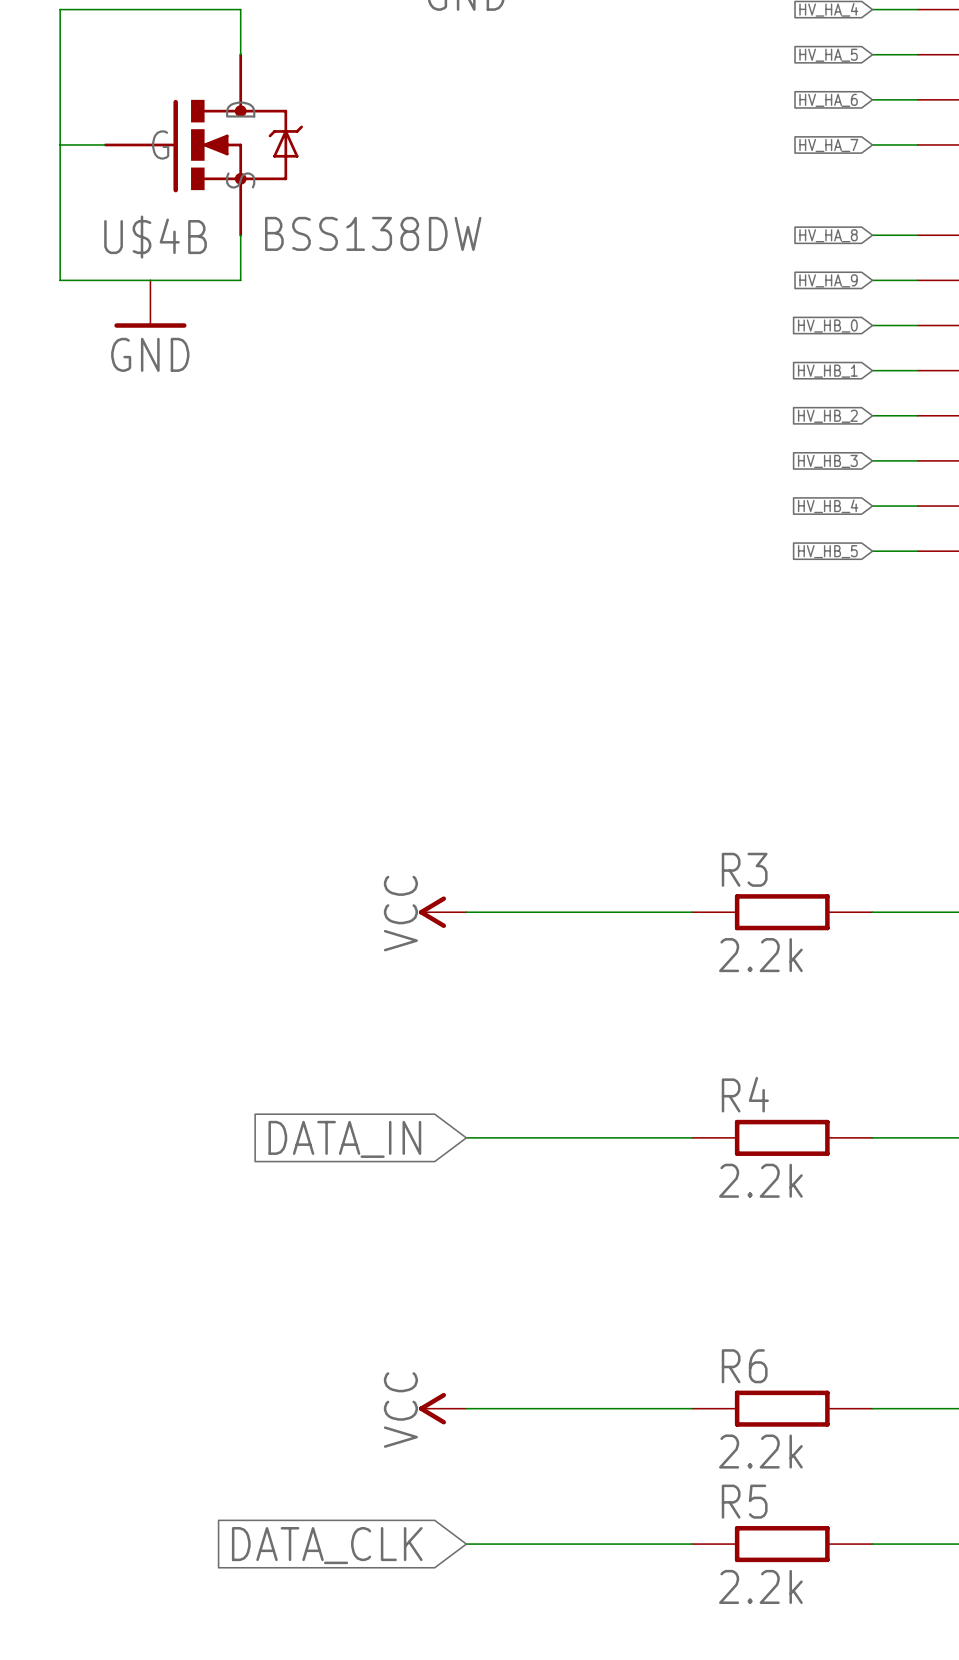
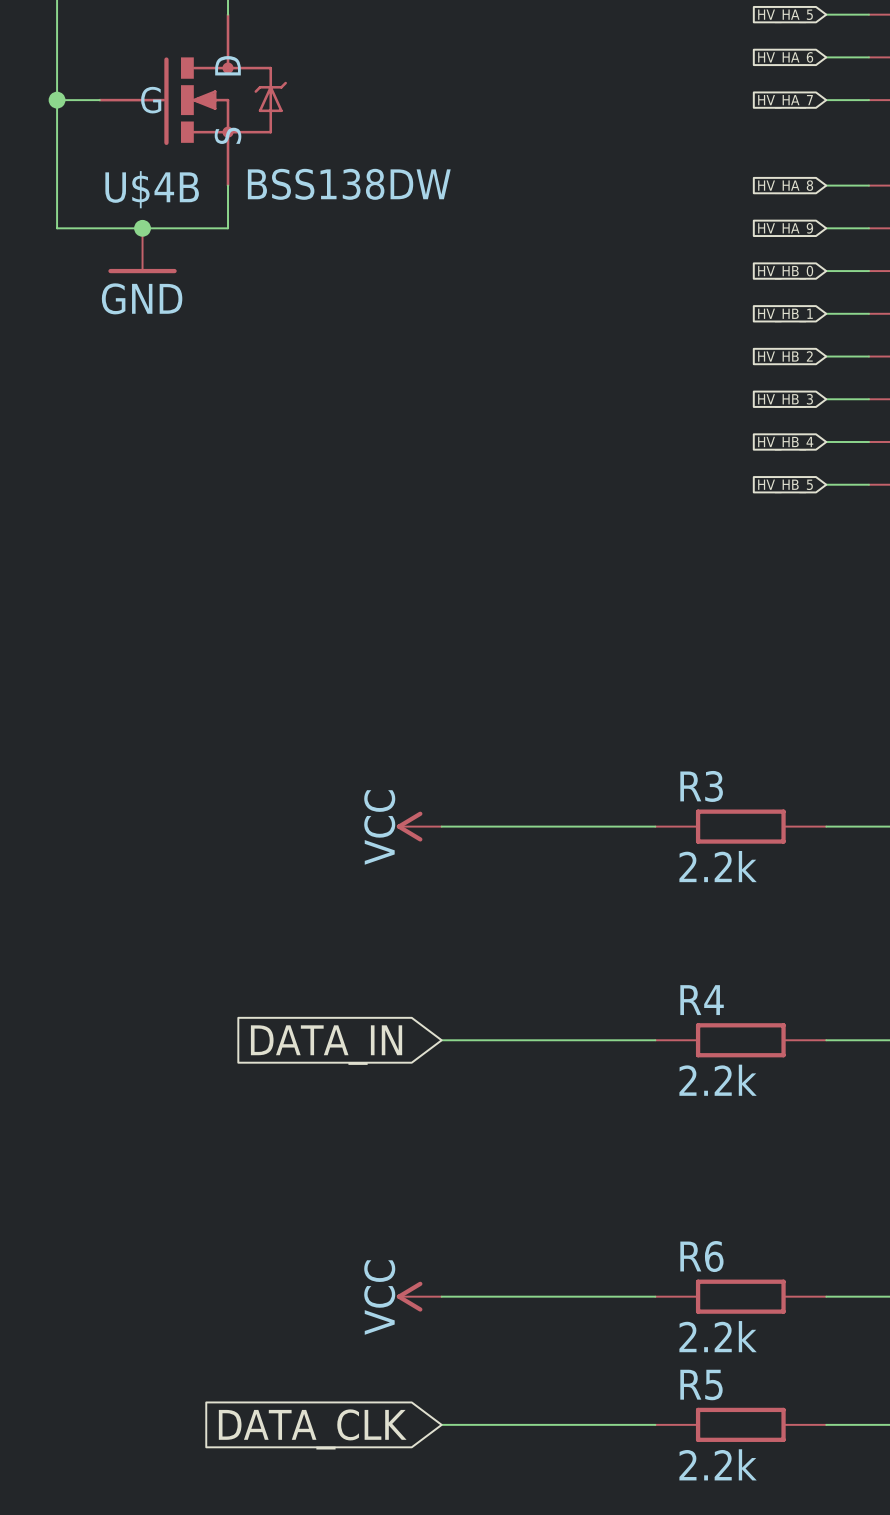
junction: none -> (57, 100)
junction: none -> (142, 228)

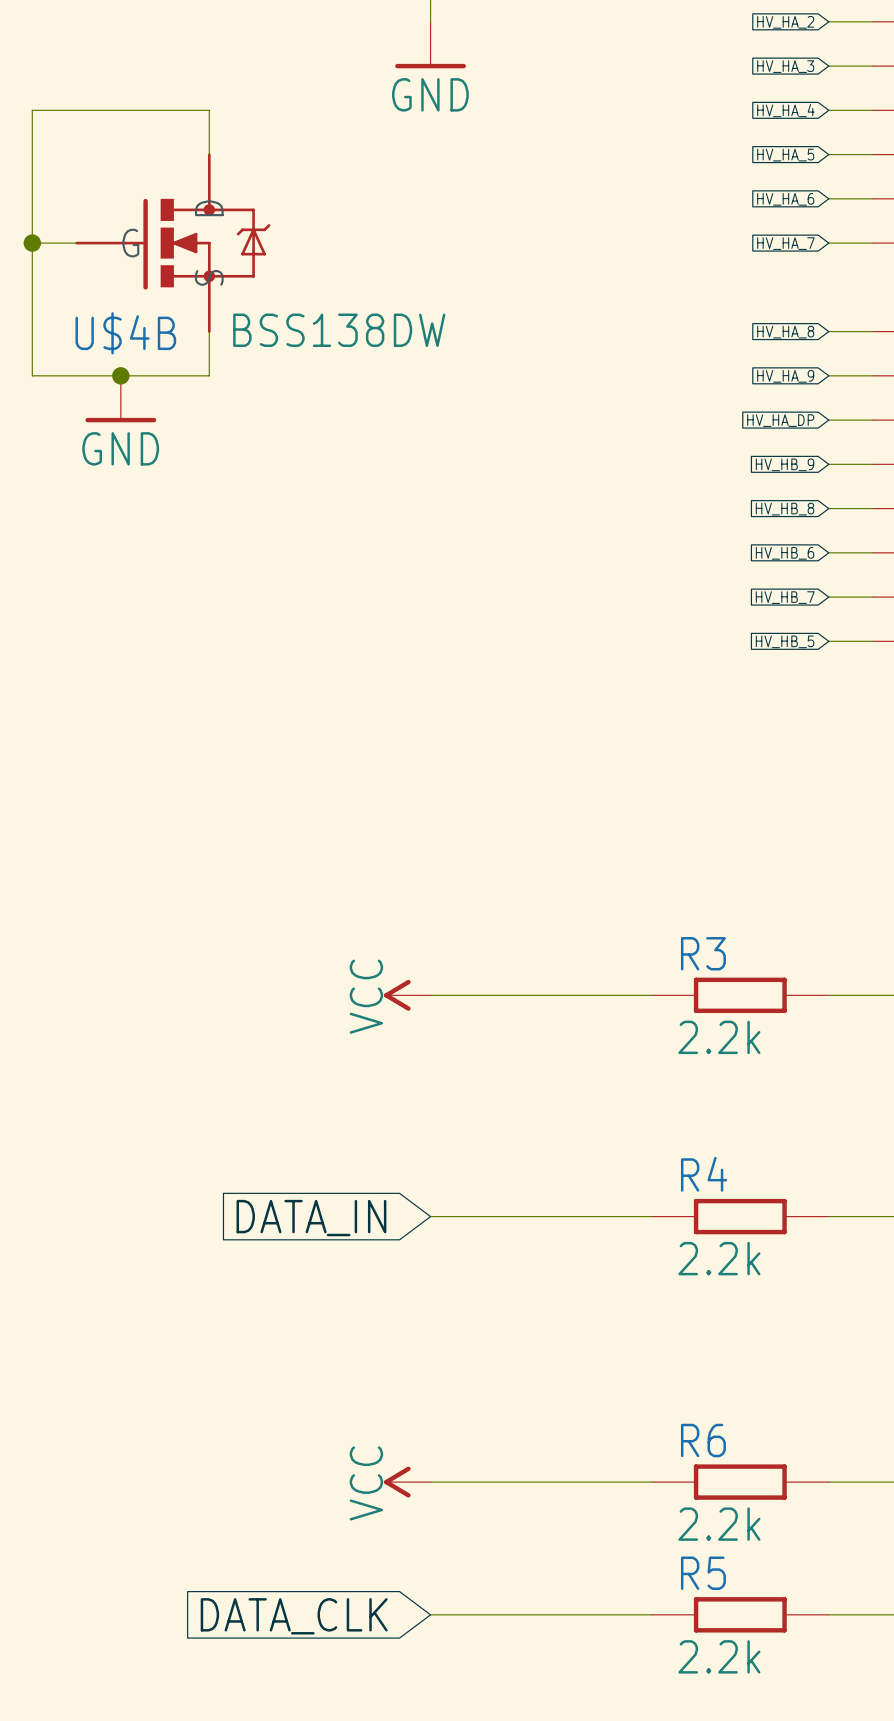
global label: HV_HB_0 (785, 272) -> HV_HA_DP (780, 420)
global label: HV_HB_1 (785, 315) -> HV_HB_9 (785, 464)
global label: HV_HB_2 (785, 358) -> HV_HB_8 (785, 509)
global label: HV_HB_3 (785, 400) -> HV_HB_6 (785, 553)
global label: HV_HB_4 (785, 443) -> HV_HB_7 (785, 597)

